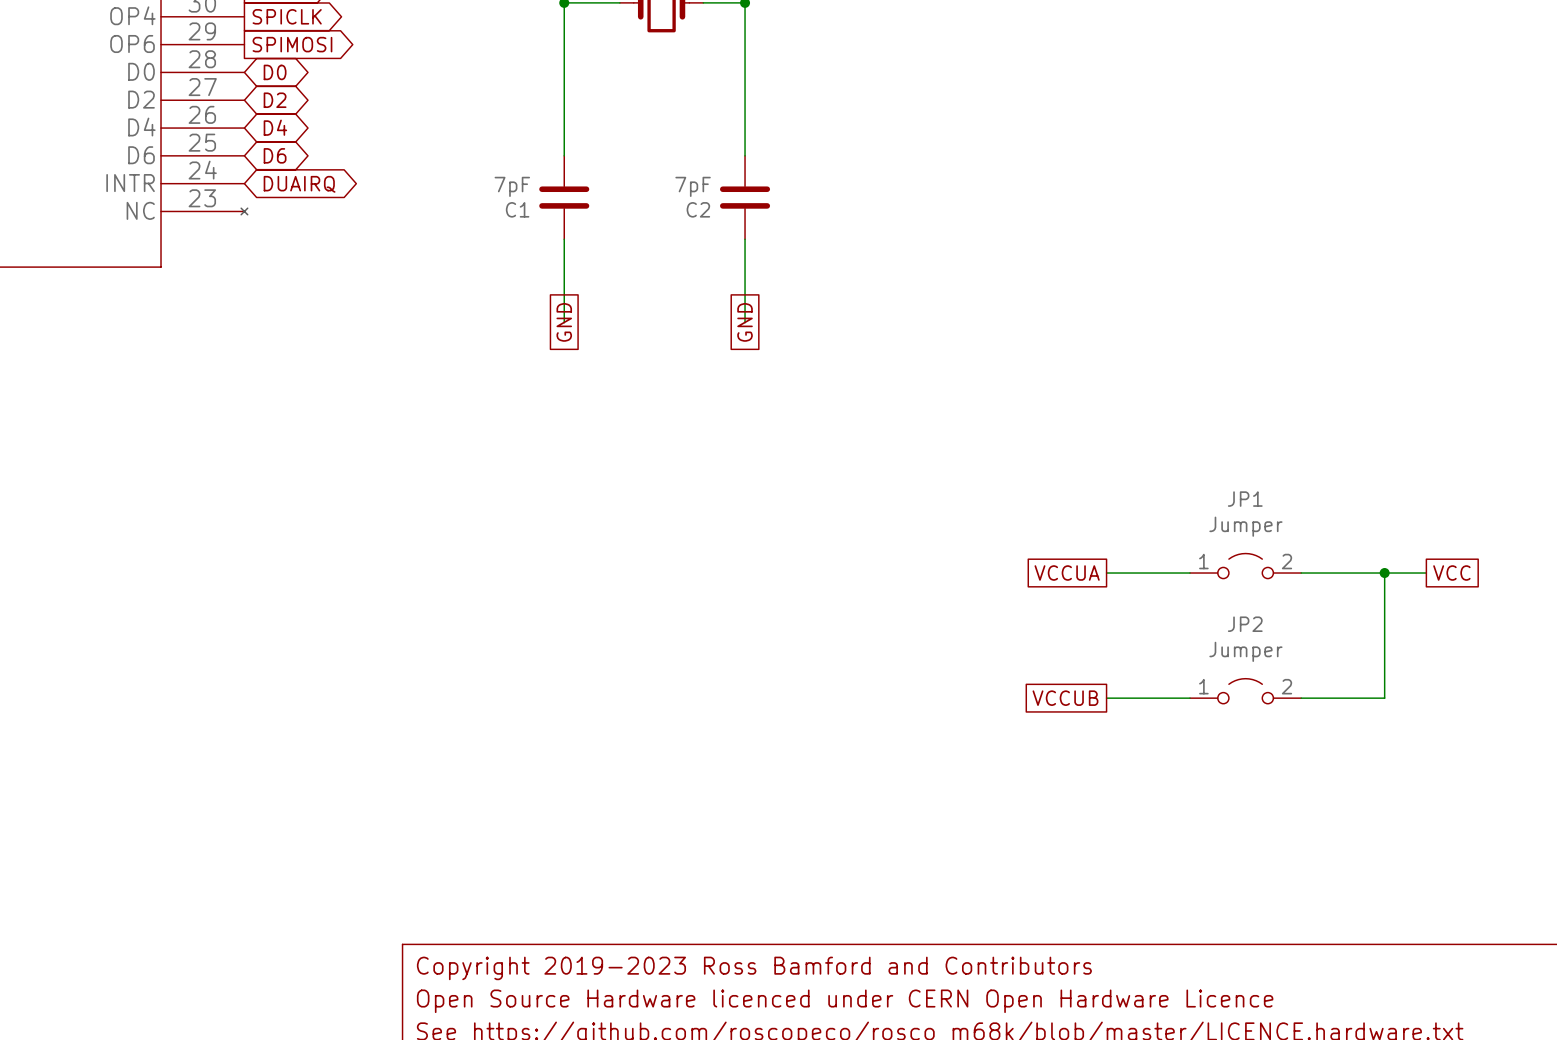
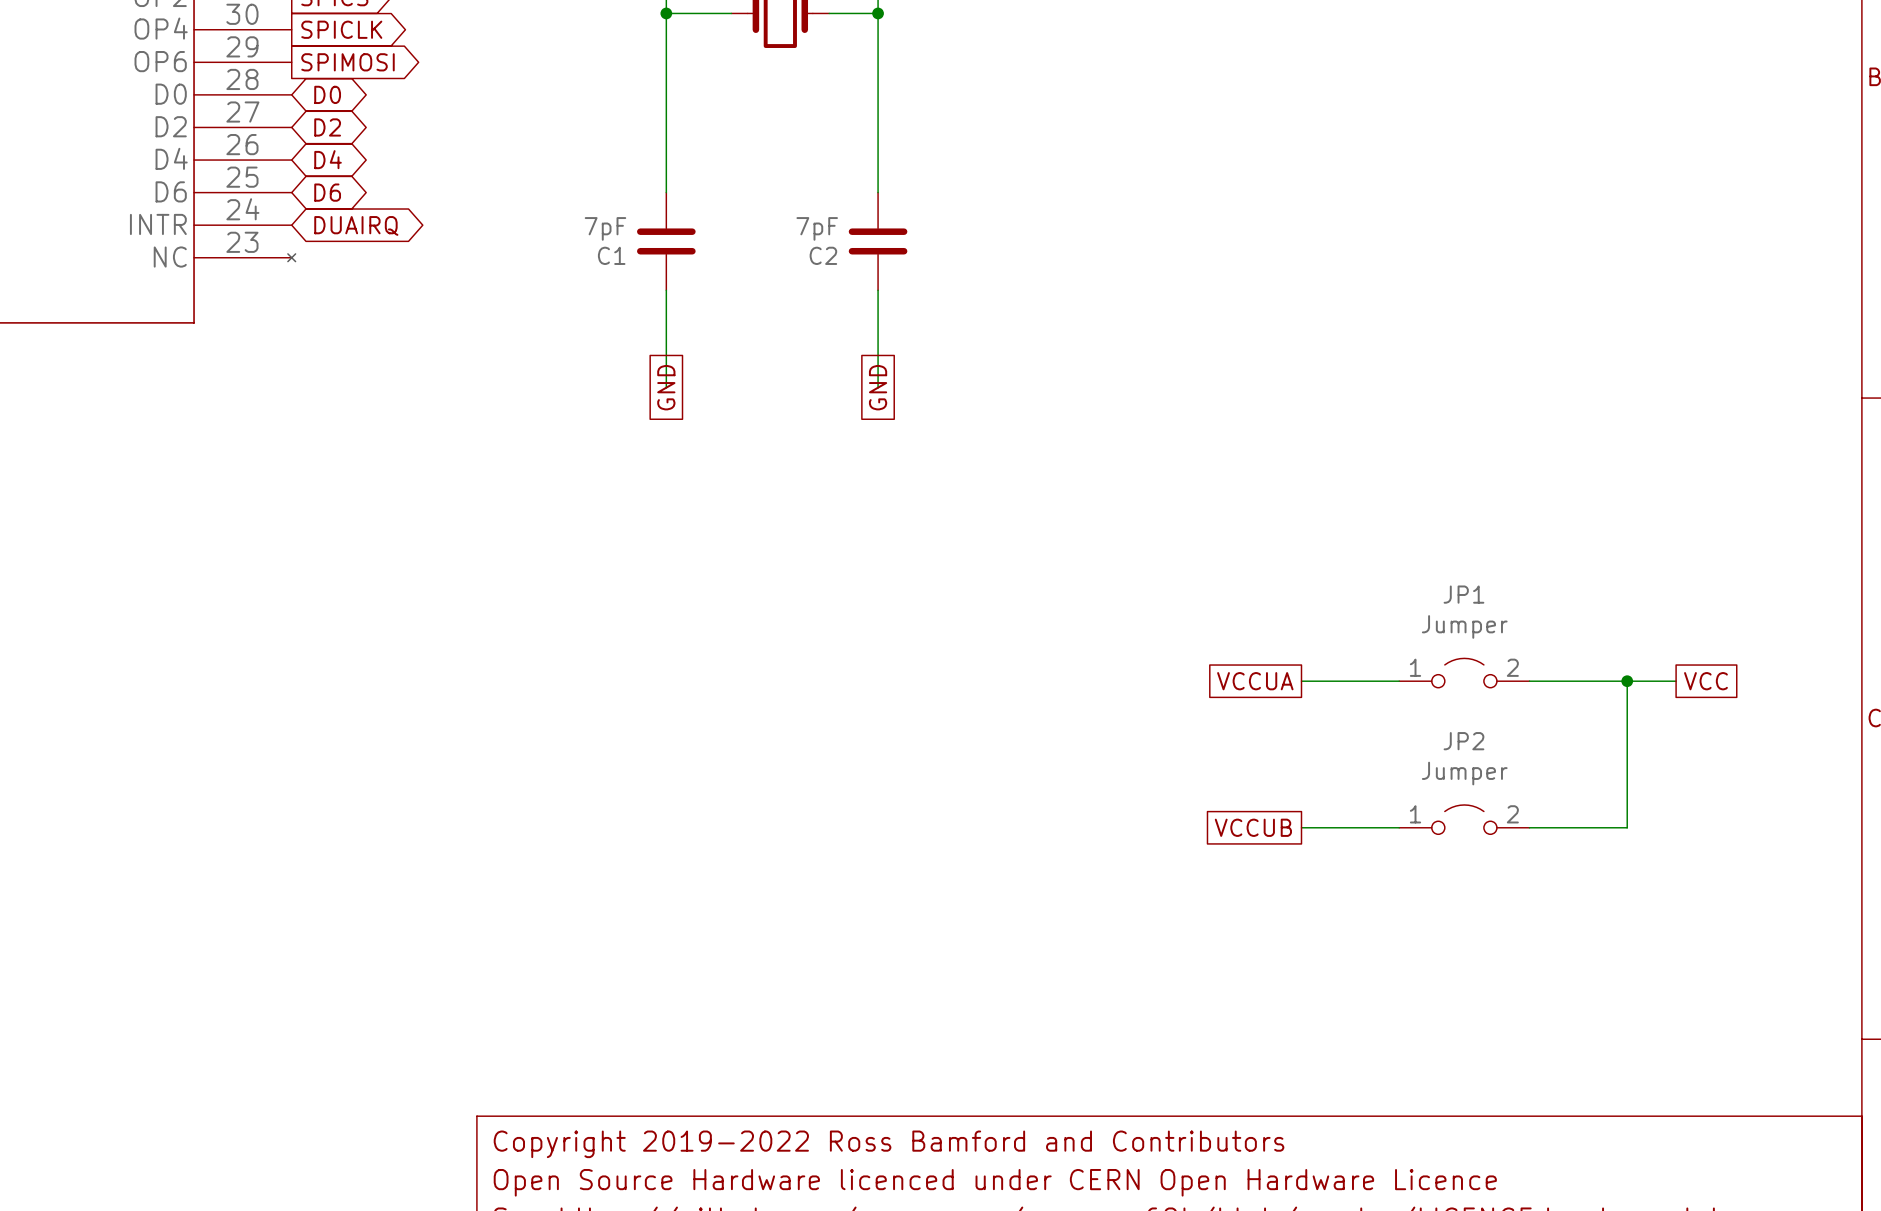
title block: Copyright 2019-2023 Ross Bamford and Contributors (754, 968) -> Copyright 2019-2022 Ross Bamford and Contributors (889, 1144)

